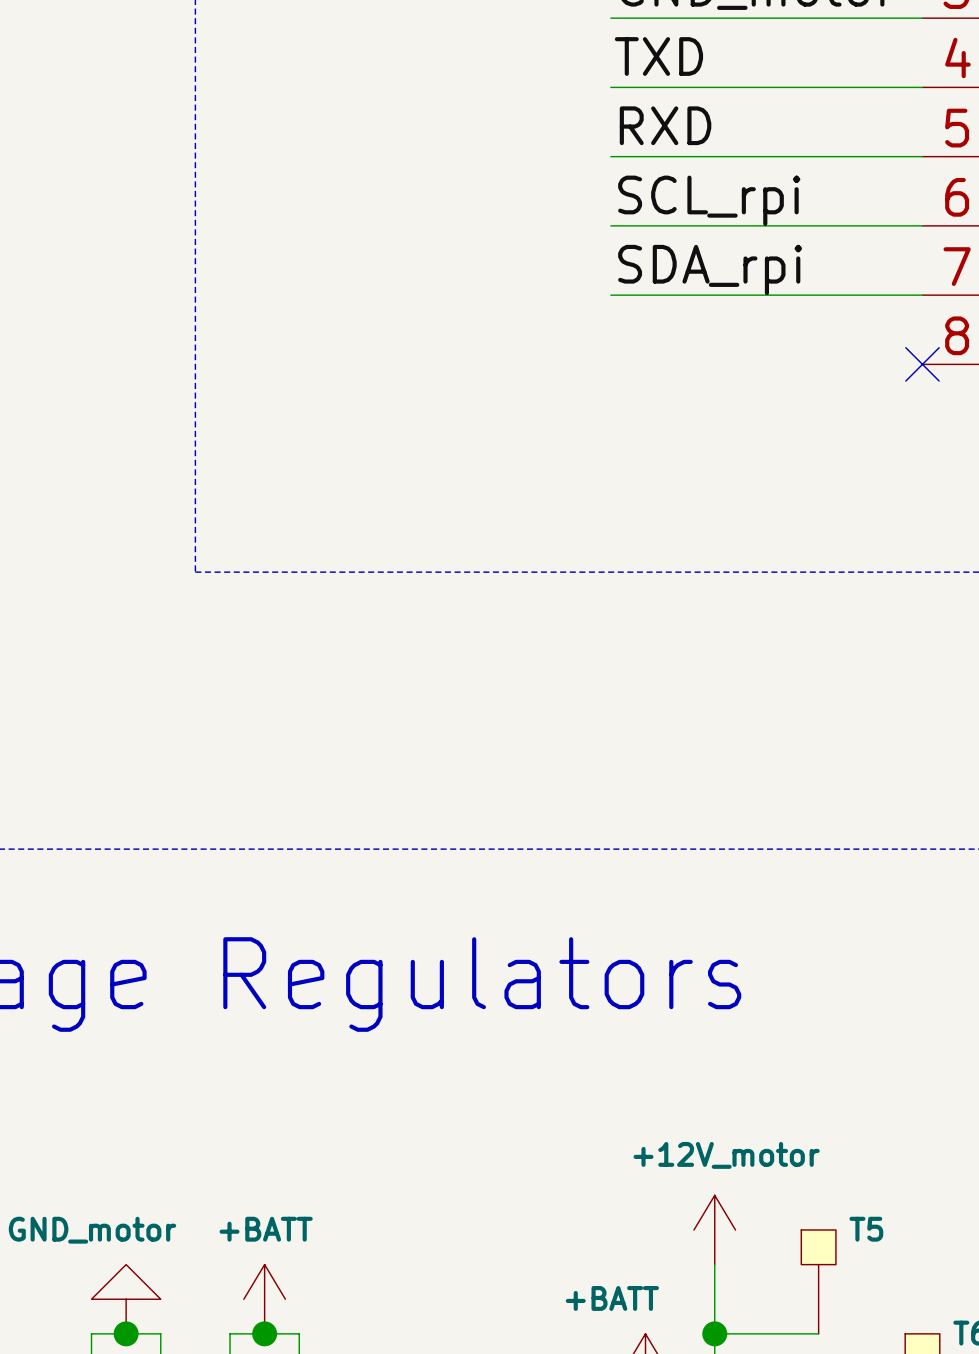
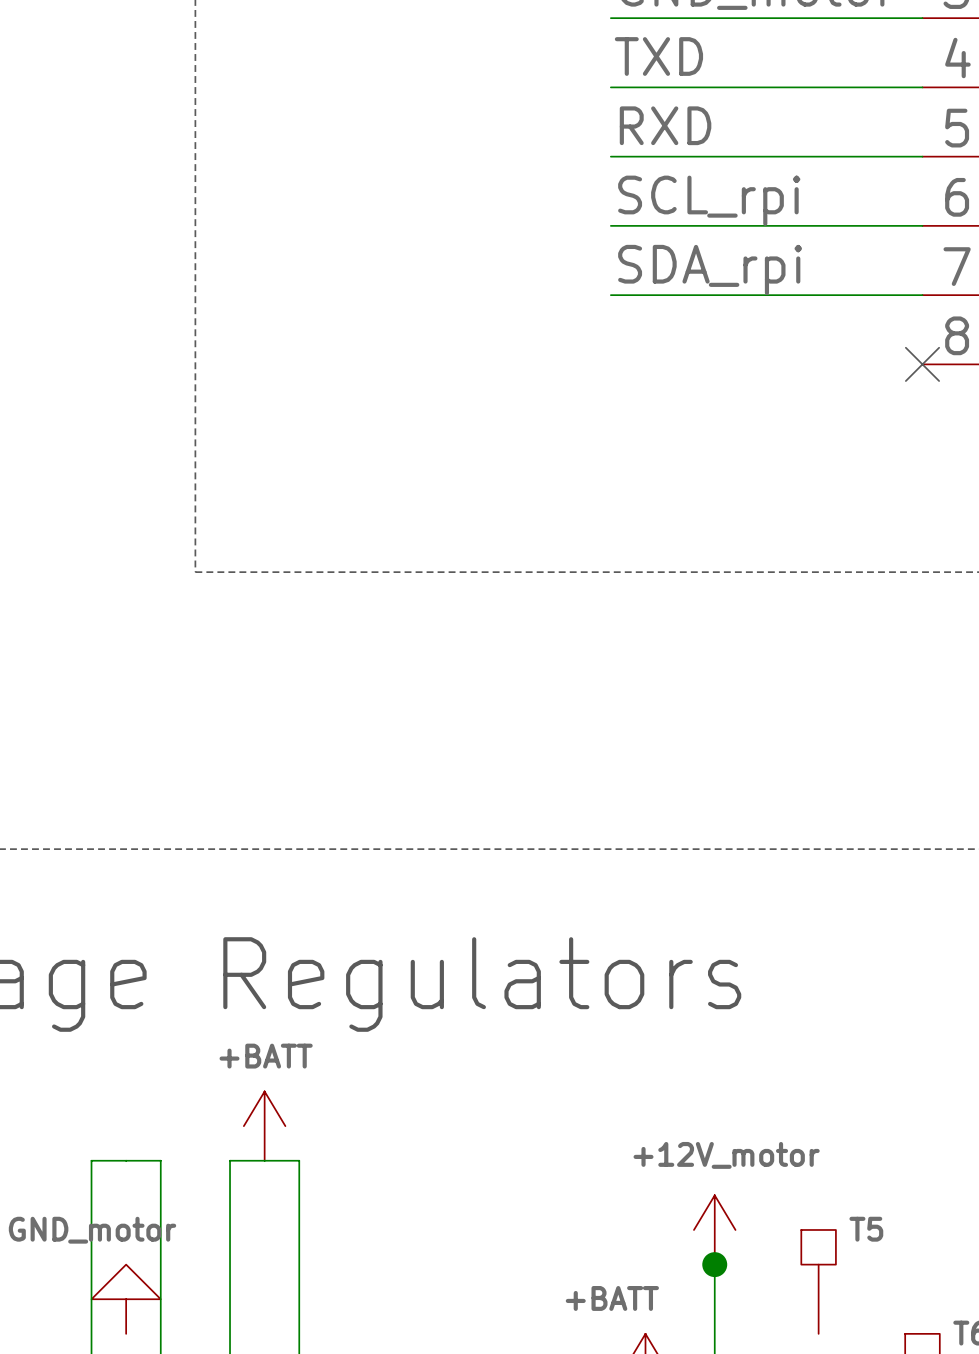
power symbol position: +BATT (264, 1299) -> +BATT (264, 1126)
wire: (91, 1333) (160, 1333) -> (91, 1333) (91, 1160) (160, 1160) (160, 1333)
junction: (126, 1333) -> none
wire: (230, 1333) (299, 1333) -> (230, 1333) (230, 1160) (299, 1160) (299, 1333)
junction: (264, 1333) -> none
wire: (714, 1333) (818, 1333) -> none
junction position: (714, 1333) -> (714, 1264)

